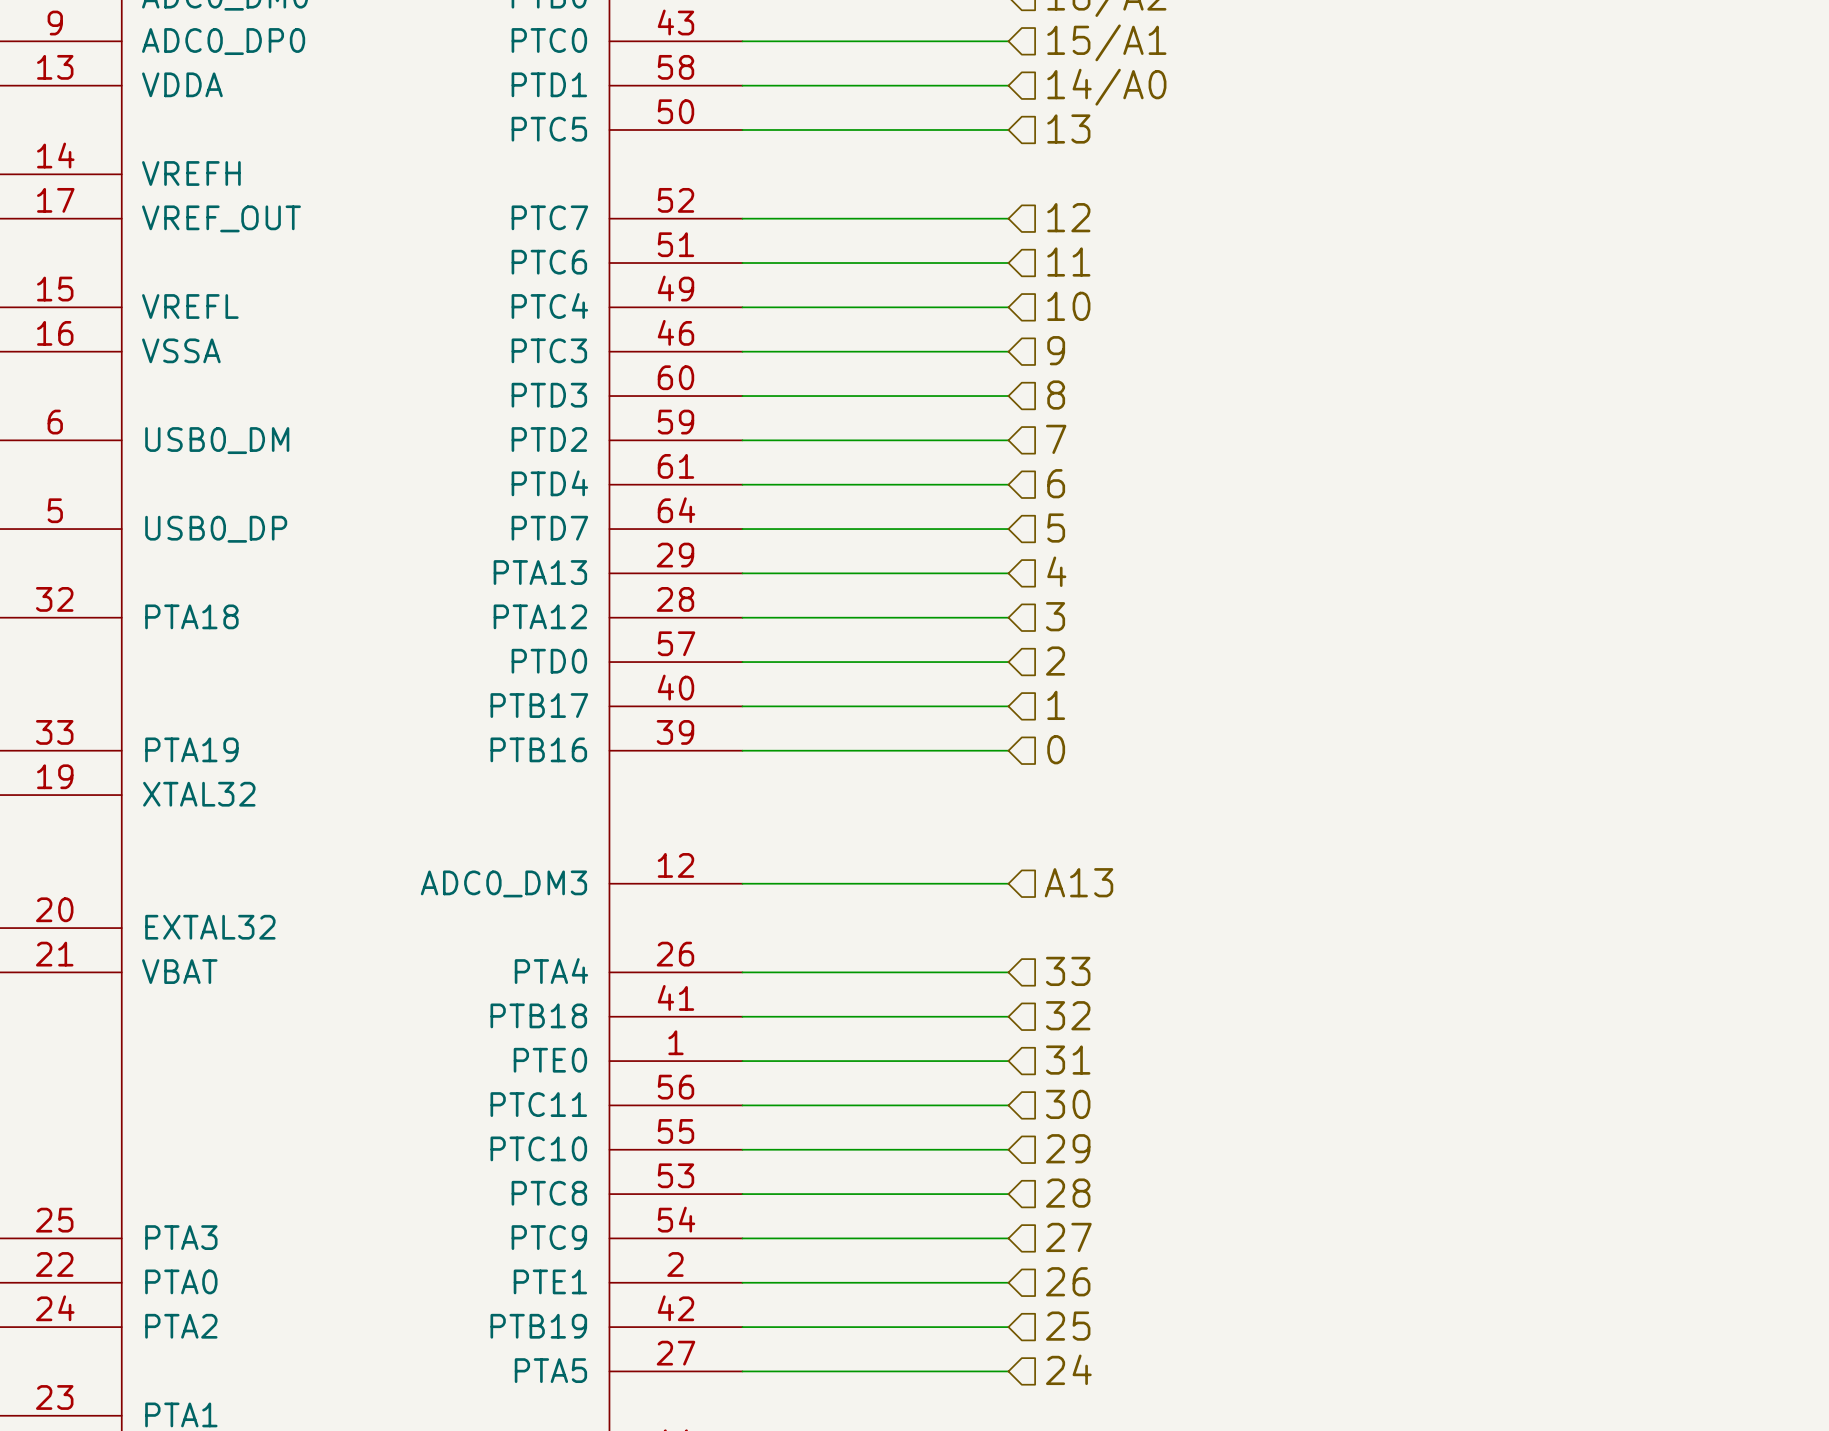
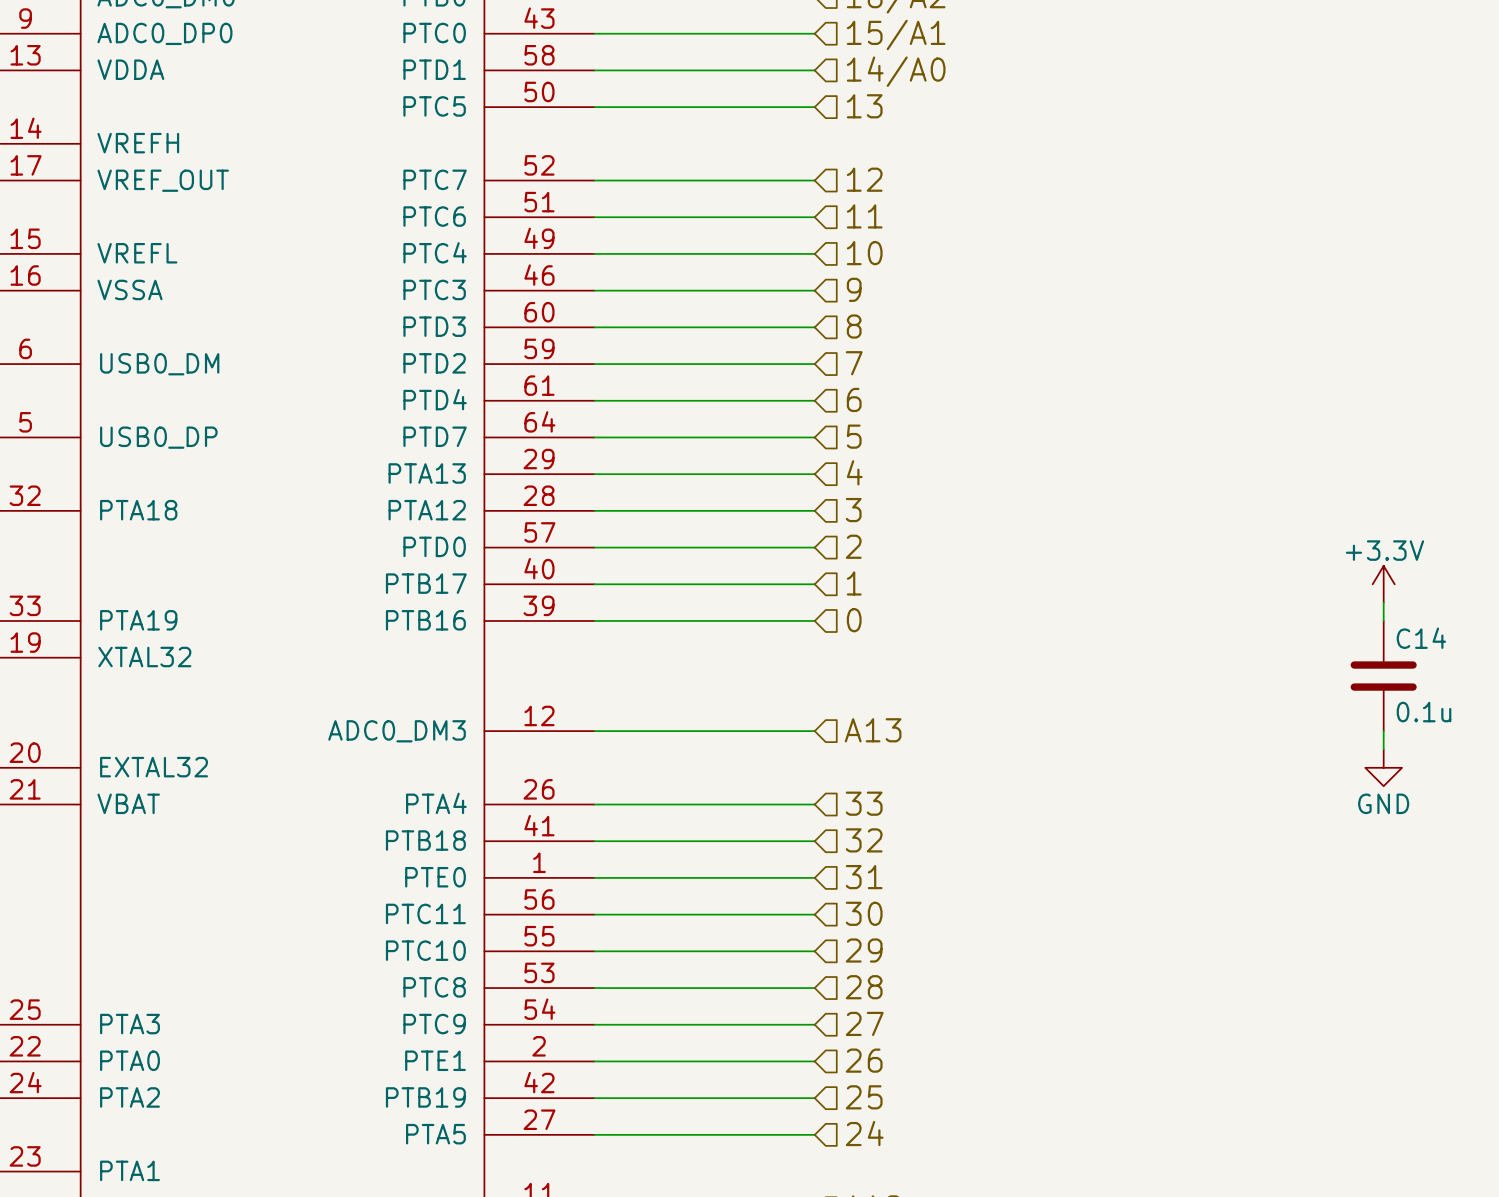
power symbol: none -> +3.3V (1383, 584)
wire: none -> (1383, 602) (1383, 620)
C14: none -> 0.1u (1383, 676)
wire: none -> (1383, 731) (1383, 749)
power symbol: none -> GND (1383, 767)

